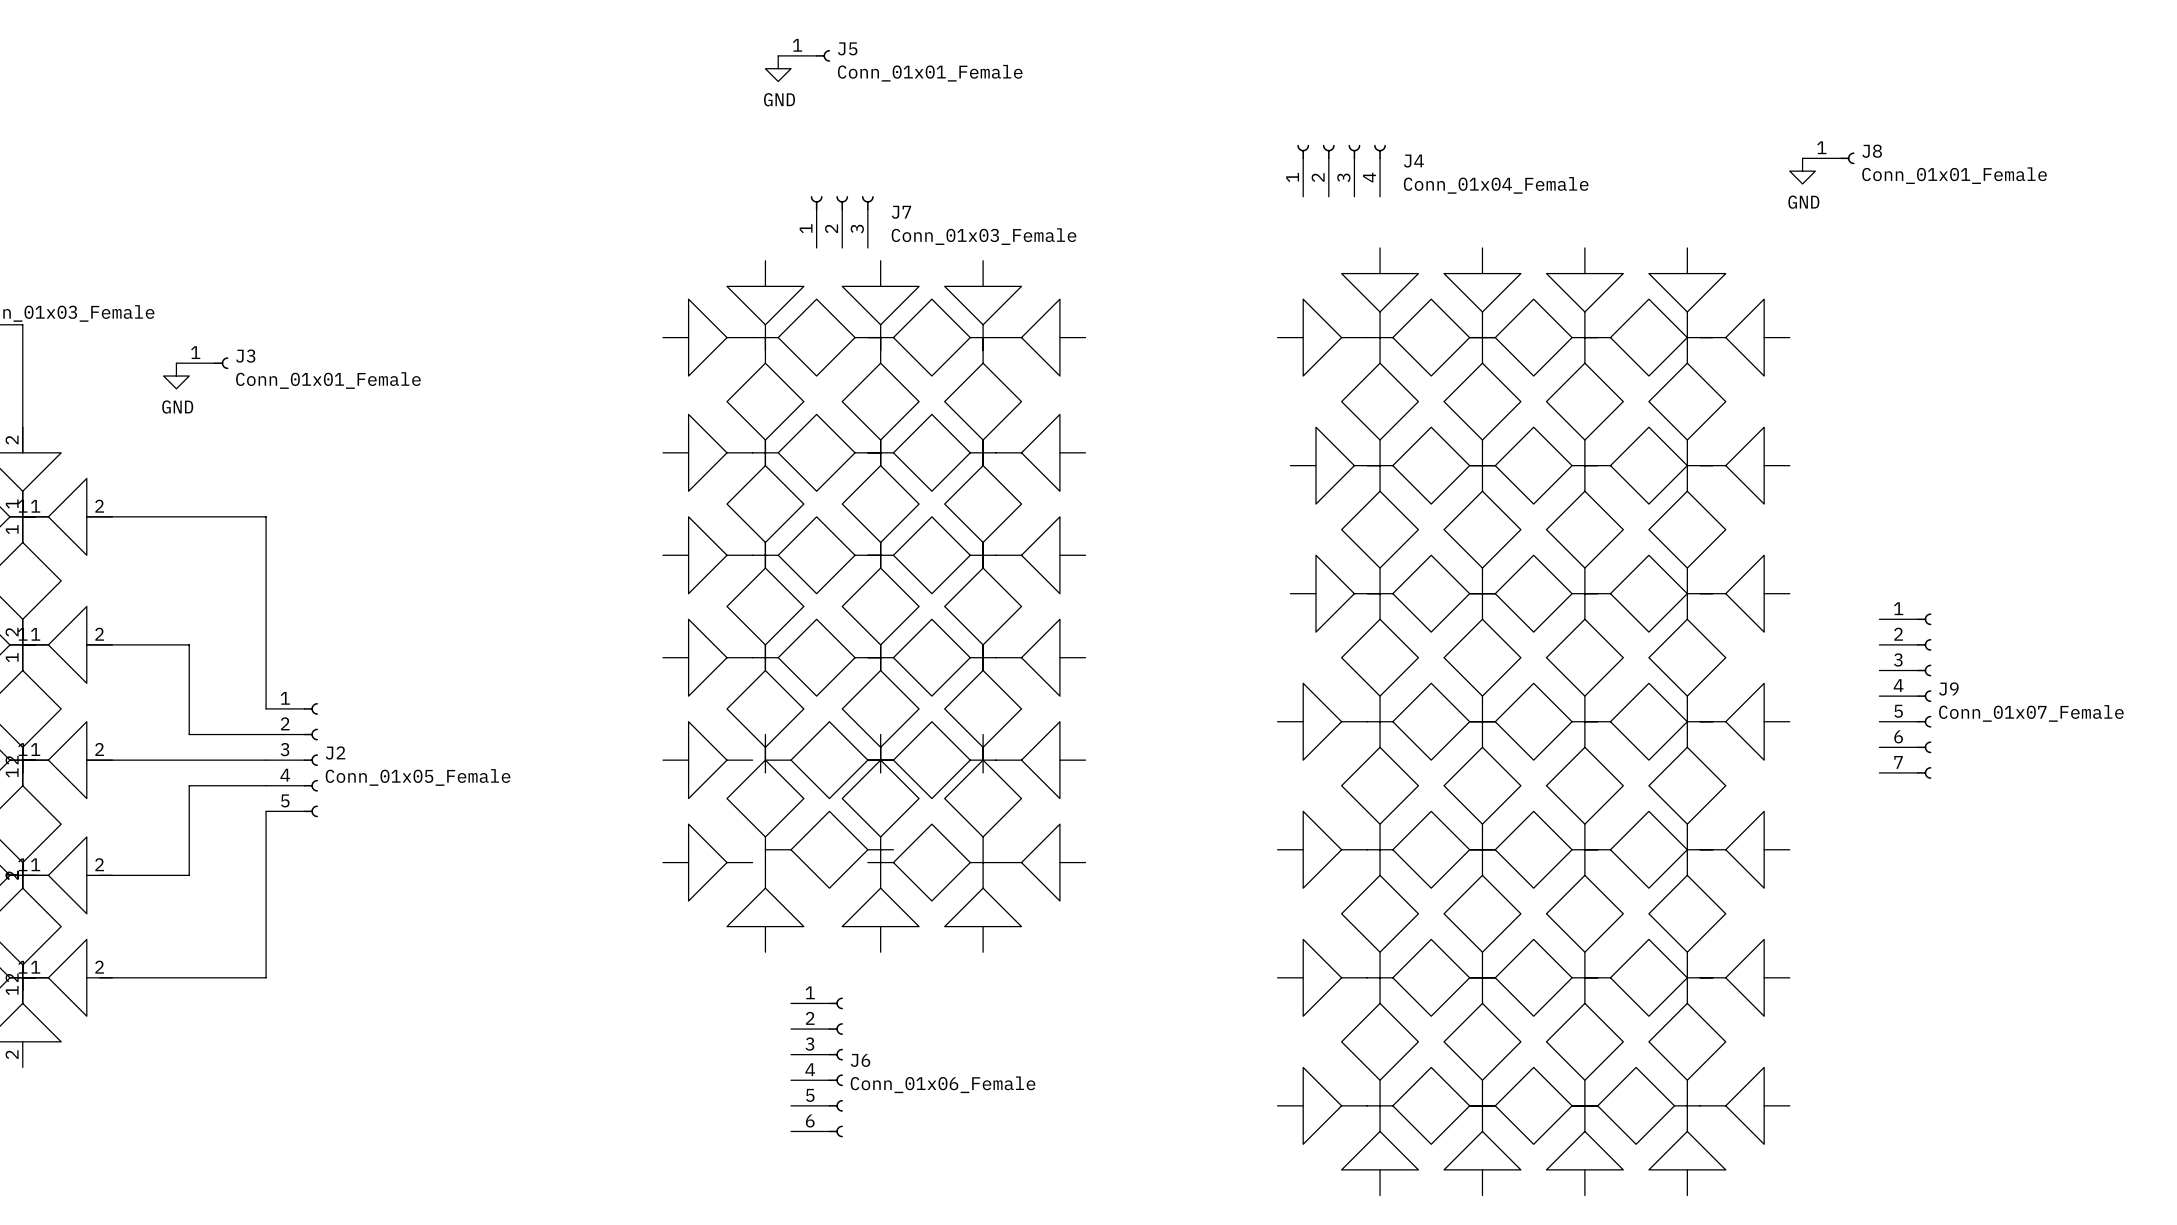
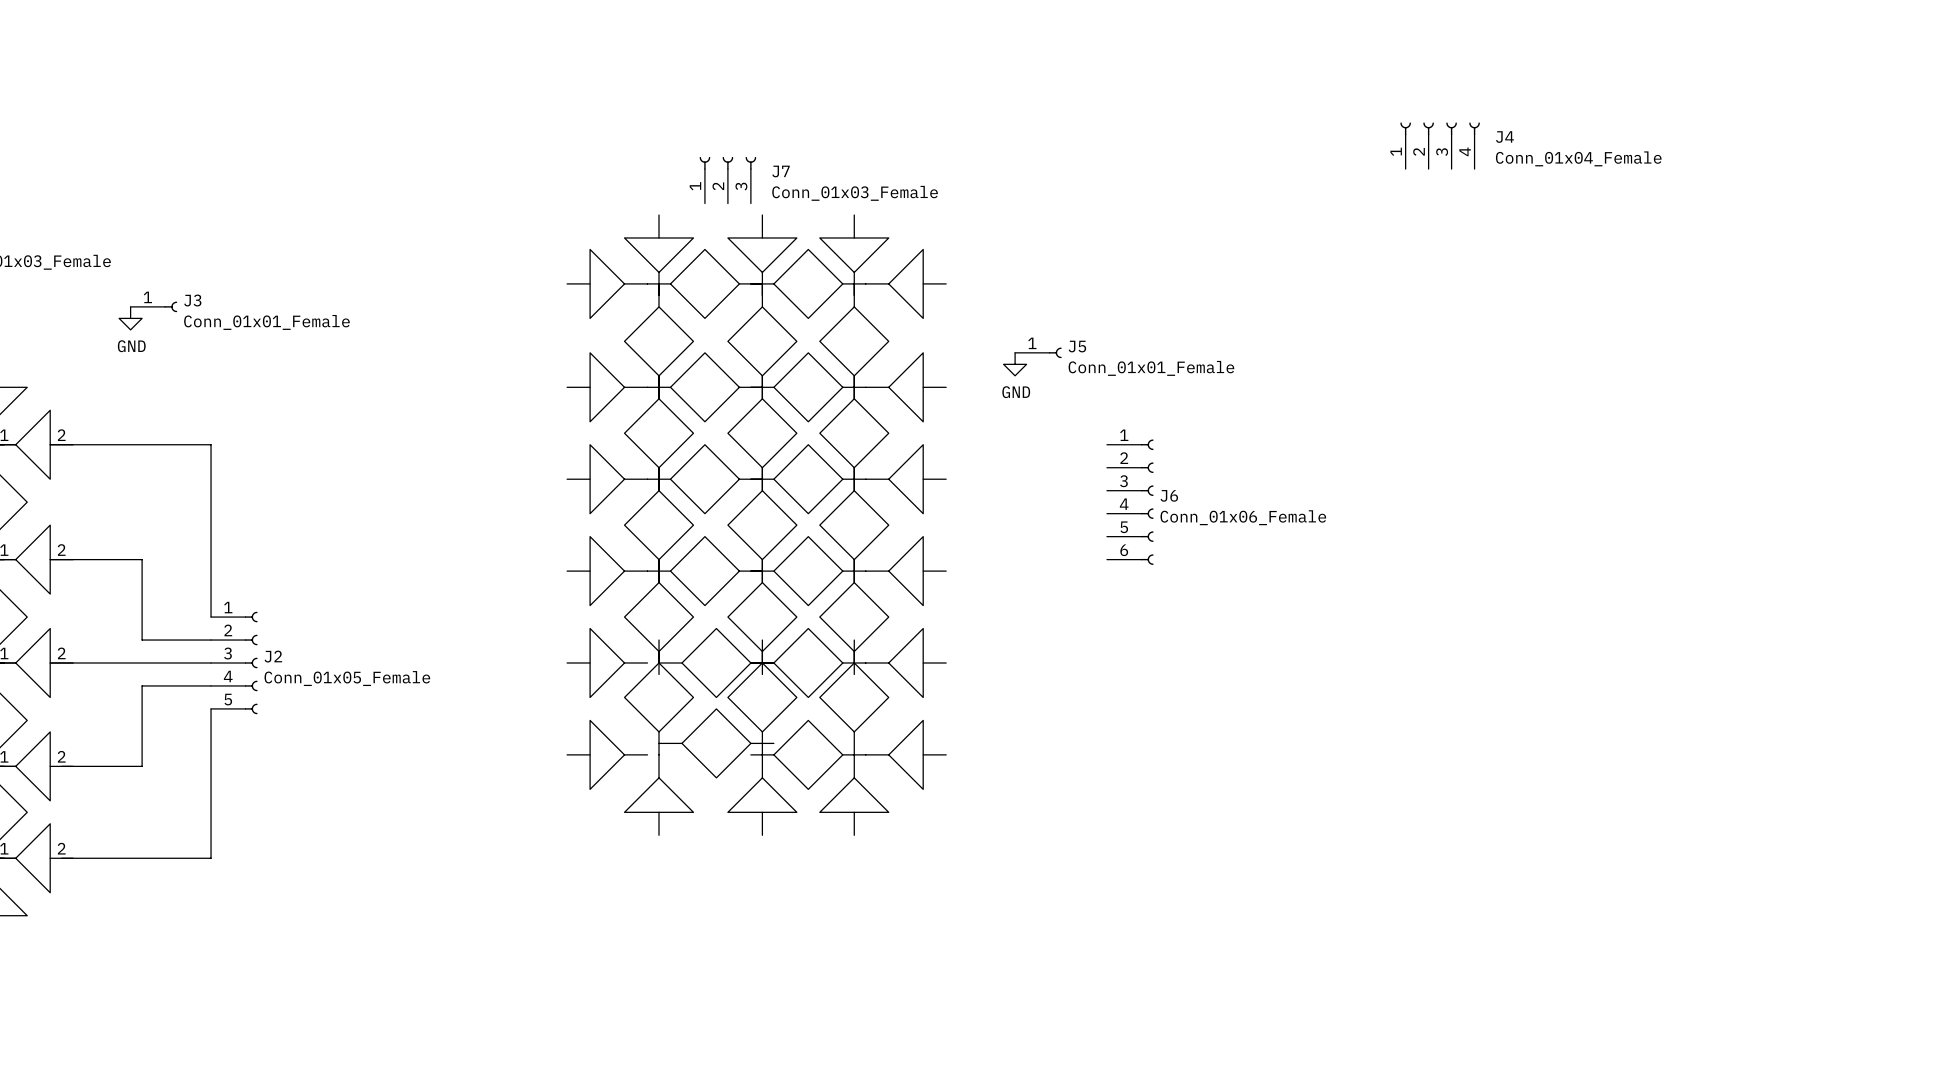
J5 position: (804, 55) -> (1038, 352)
power symbol: GND (778, 68) -> none
J8: Conn_01x01_Female (1828, 158) -> none
J4 position: (1341, 170) -> (1440, 145)
power symbol: GND (1802, 171) -> none
part: (1380, 292) -> none
part: (1482, 292) -> none
part: (1584, 292) -> none
part: (1687, 292) -> none
part: (1322, 337) -> none
part: (1431, 337) -> none
part: (1533, 337) -> none
part: (1648, 337) -> none
part: (1744, 337) -> none
part: (1380, 401) -> none
part: (1482, 401) -> none
part: (1584, 401) -> none
part: (1687, 401) -> none
power symbol: none -> GND (1015, 364)
part: (1335, 465) -> none
part: (1431, 465) -> none
part: (1533, 465) -> none
part: (1648, 465) -> none
part: (1744, 465) -> none
part: (1380, 529) -> none
part: (1482, 529) -> none
part: (1584, 529) -> none
part: (1687, 529) -> none
part: (1335, 593) -> none
part: (1431, 593) -> none
part: (1533, 593) -> none
part: (1648, 593) -> none
part: (1744, 593) -> none
part: (1380, 657) -> none
part: (1482, 657) -> none
part: (1584, 657) -> none
part: (1687, 657) -> none
J9: Conn_01x07_Female (1905, 696) -> none
part: (1322, 721) -> none
part: (1431, 721) -> none
part: (1533, 721) -> none
part: (1648, 721) -> none
part: (1744, 721) -> none
part: (1380, 785) -> none
part: (1482, 785) -> none
part: (1584, 785) -> none
part: (1687, 785) -> none
part: (1322, 849) -> none
part: (1431, 849) -> none
part: (1533, 849) -> none
part: (1648, 849) -> none
part: (1744, 849) -> none
part: (1380, 913) -> none
part: (1482, 913) -> none
part: (1584, 913) -> none
part: (1687, 913) -> none
part: (1322, 977) -> none
part: (1431, 977) -> none
part: (1533, 977) -> none
part: (1648, 977) -> none
part: (1744, 977) -> none
part: (1380, 1041) -> none
part: (1482, 1041) -> none
part: (1584, 1041) -> none
part: (1687, 1041) -> none
J6 position: (817, 1067) -> (1130, 502)
part: (1322, 1105) -> none
part: (1431, 1105) -> none
part: (1533, 1105) -> none
part: (1636, 1105) -> none
part: (1744, 1105) -> none
part: (1380, 1150) -> none
part: (1482, 1150) -> none
part: (1584, 1150) -> none
part: (1687, 1150) -> none

